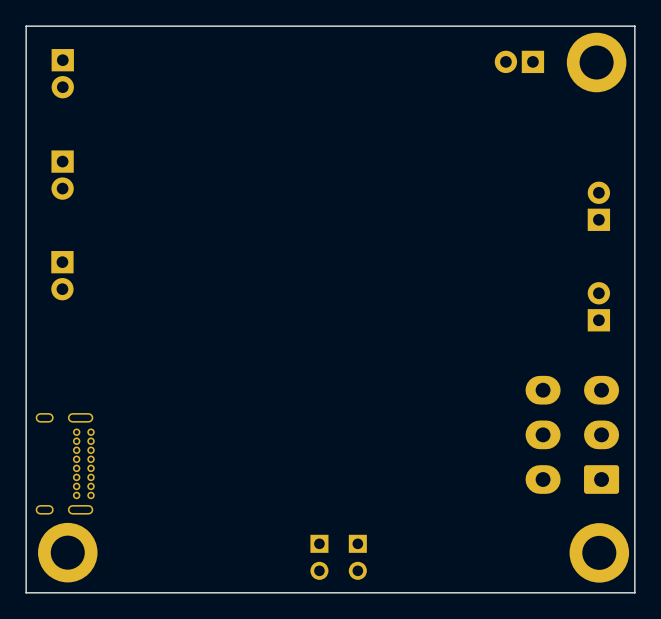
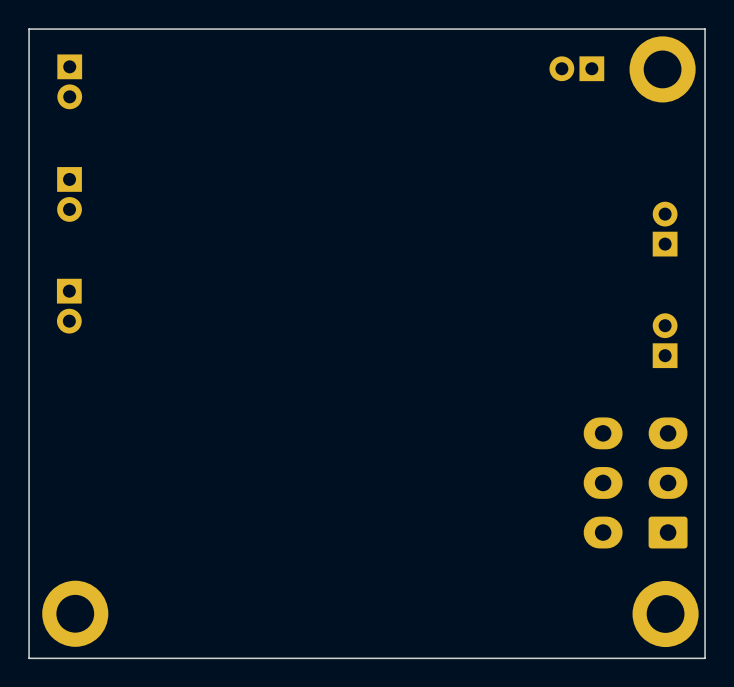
part: (65, 463) -> none
part: (319, 557) -> none
part: (357, 557) -> none

